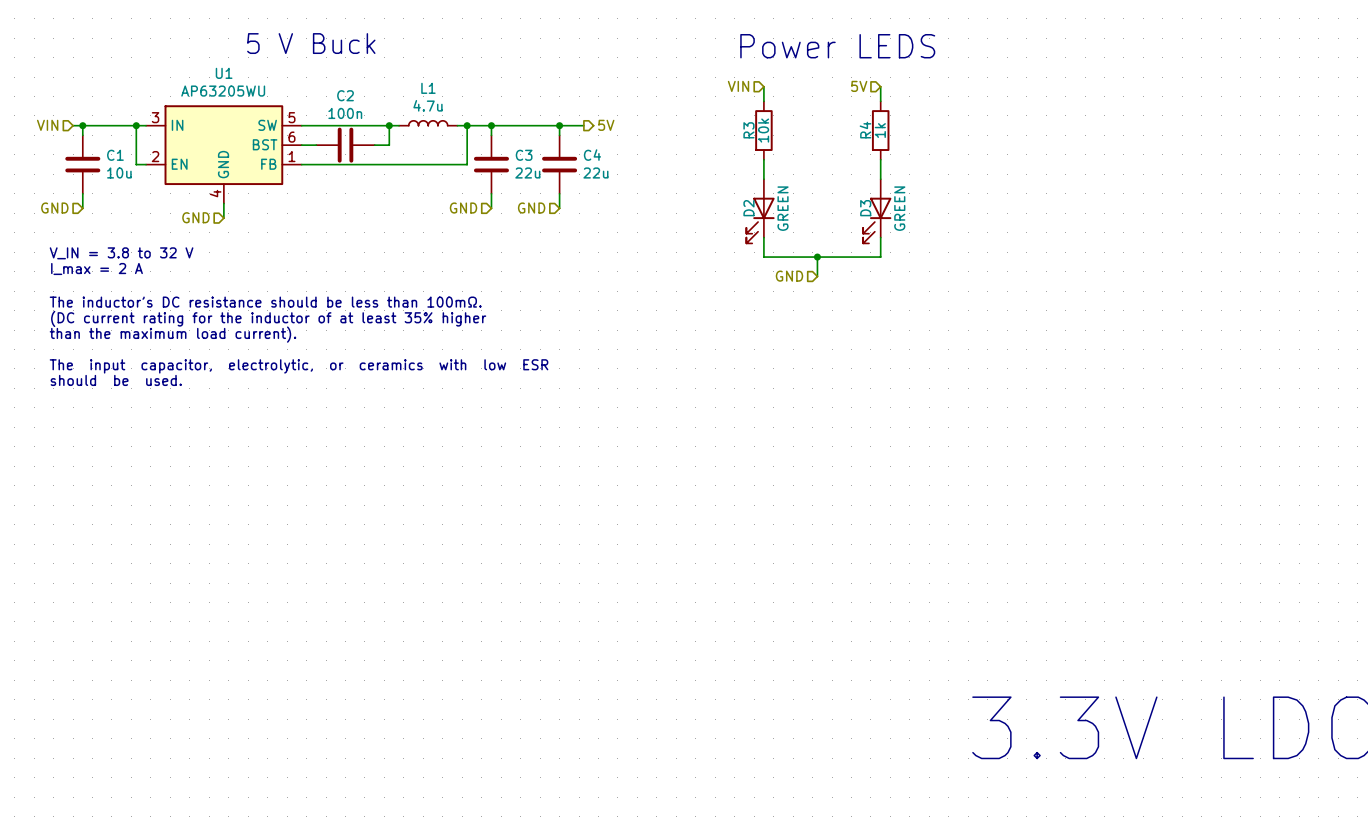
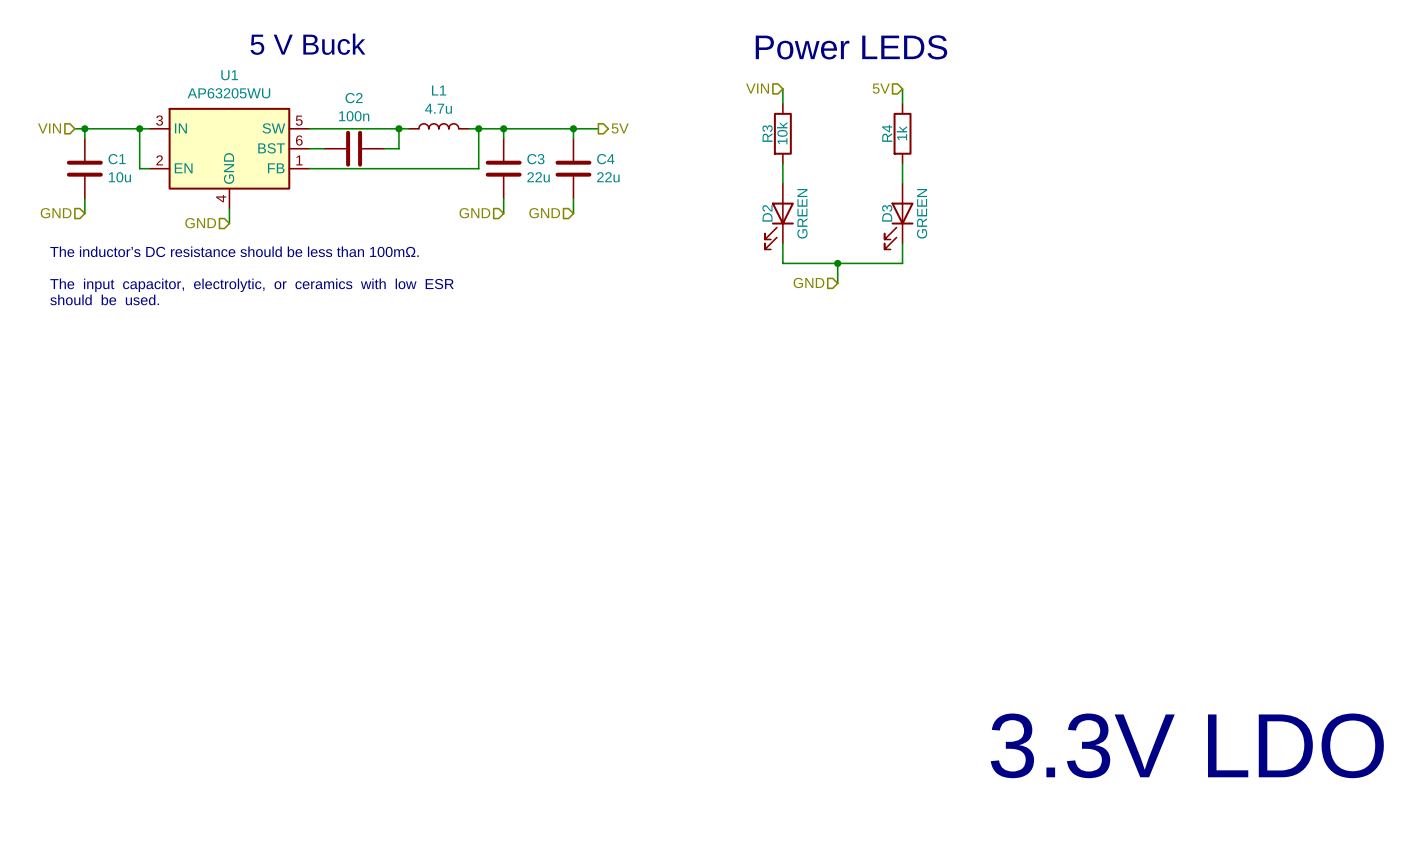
text: V_IN = 3.8 to 32 V (121, 253) -> The inductor’s DC resistance should be less than 100mΩ. (234, 251)
text: I_max = 2 A (97, 268) -> none
text: The inductor’s DC resistance should be less than 100mΩ. (265, 302) -> none
text: (DC current rating for the inductor of at least 35% higher (268, 318) -> none
text: than the maximum load current). (172, 334) -> none
text position: The input capacitor, electrolytic, or ceramics with low ESR (299, 366) -> The input capacitor, electrolytic, or ceramics with low ESR (251, 285)
text position: should be used. (116, 380) -> should be used. (104, 299)

